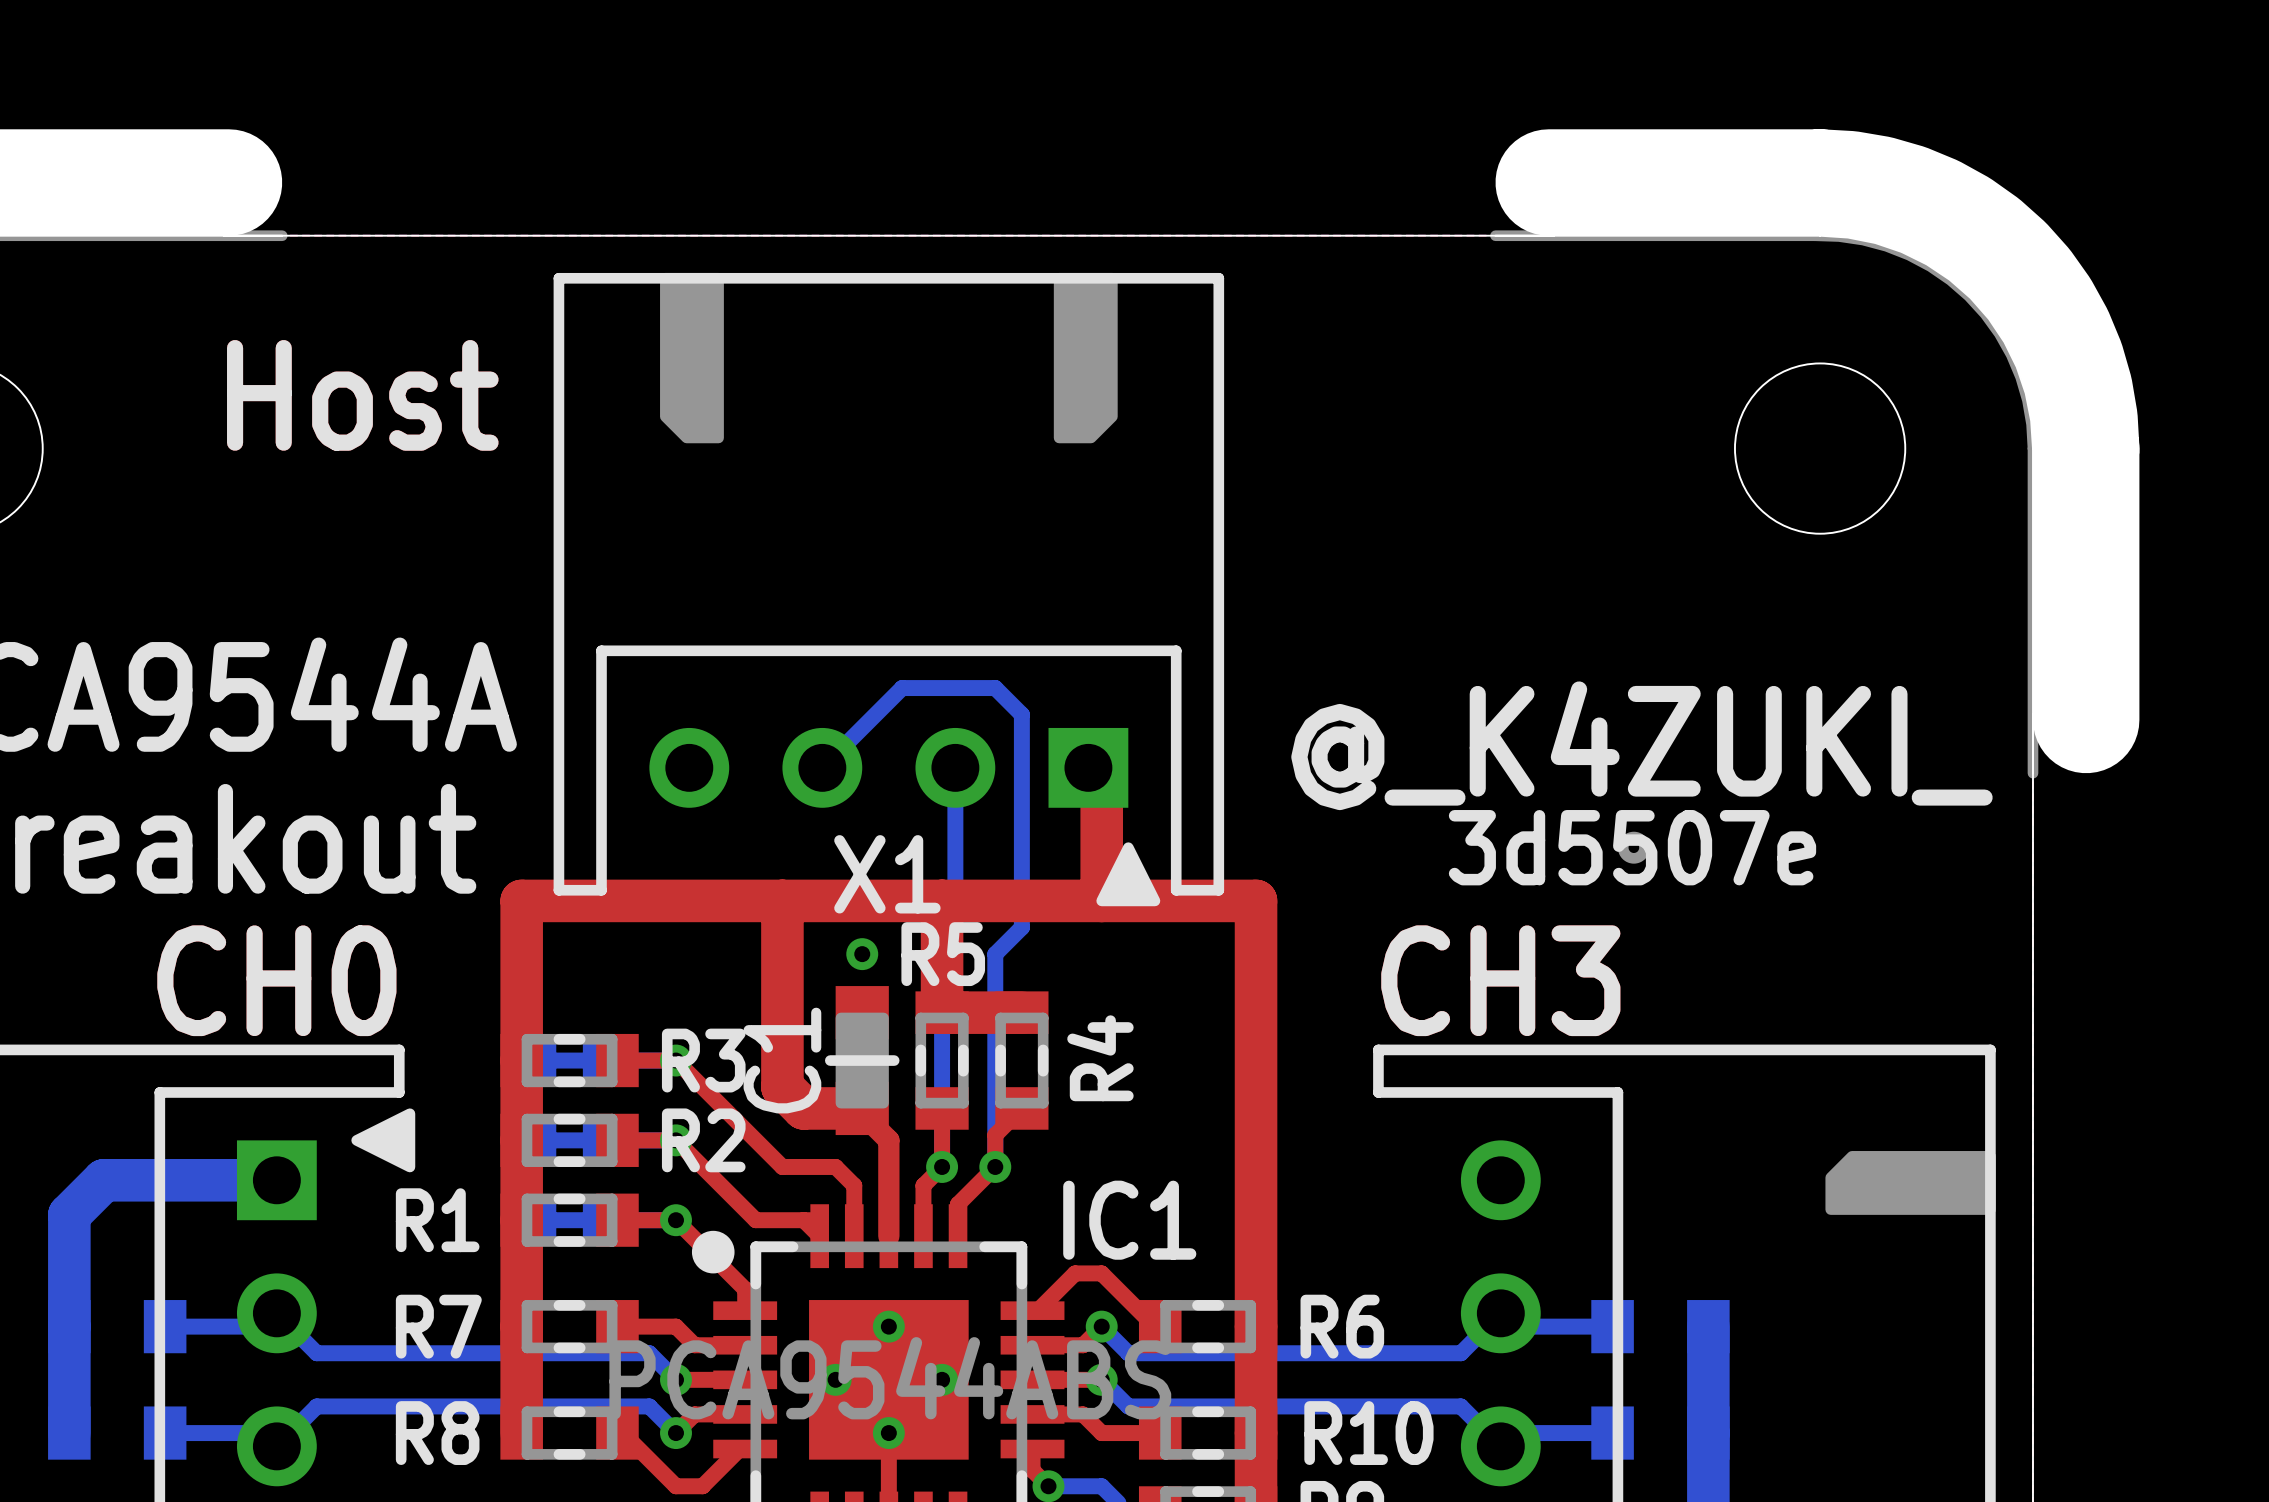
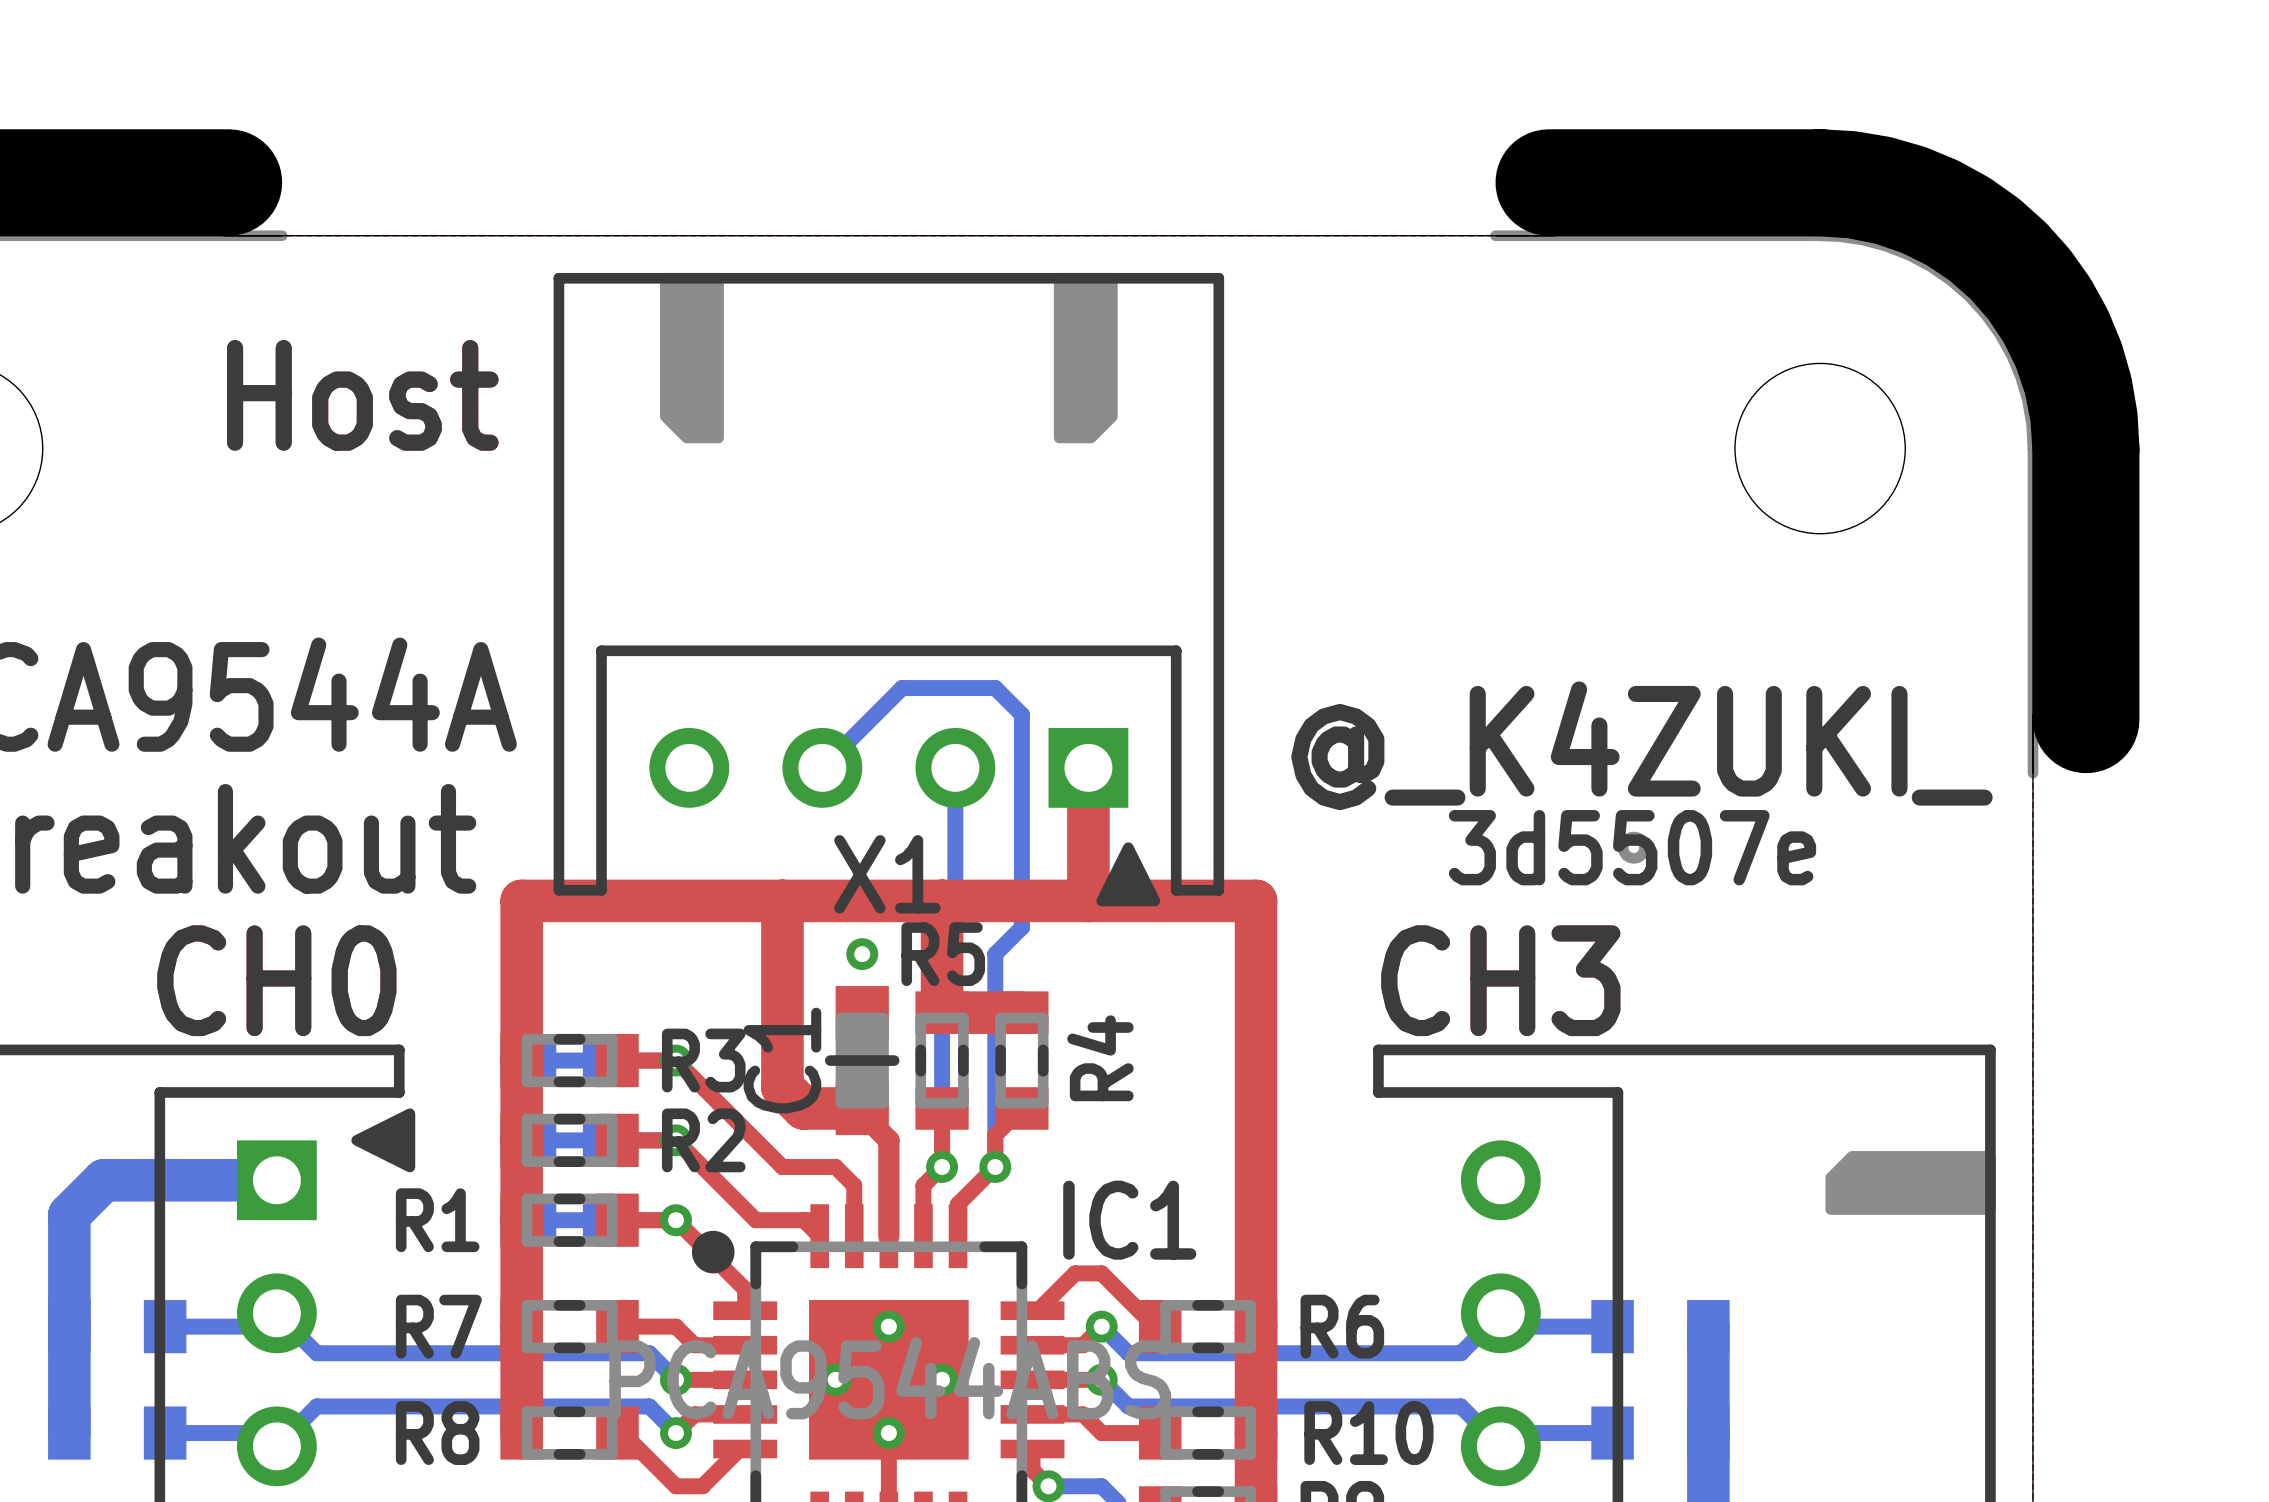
top track: (1088, 767) (1101, 767) (1101, 900) -> (1088, 767) (1088, 900)

